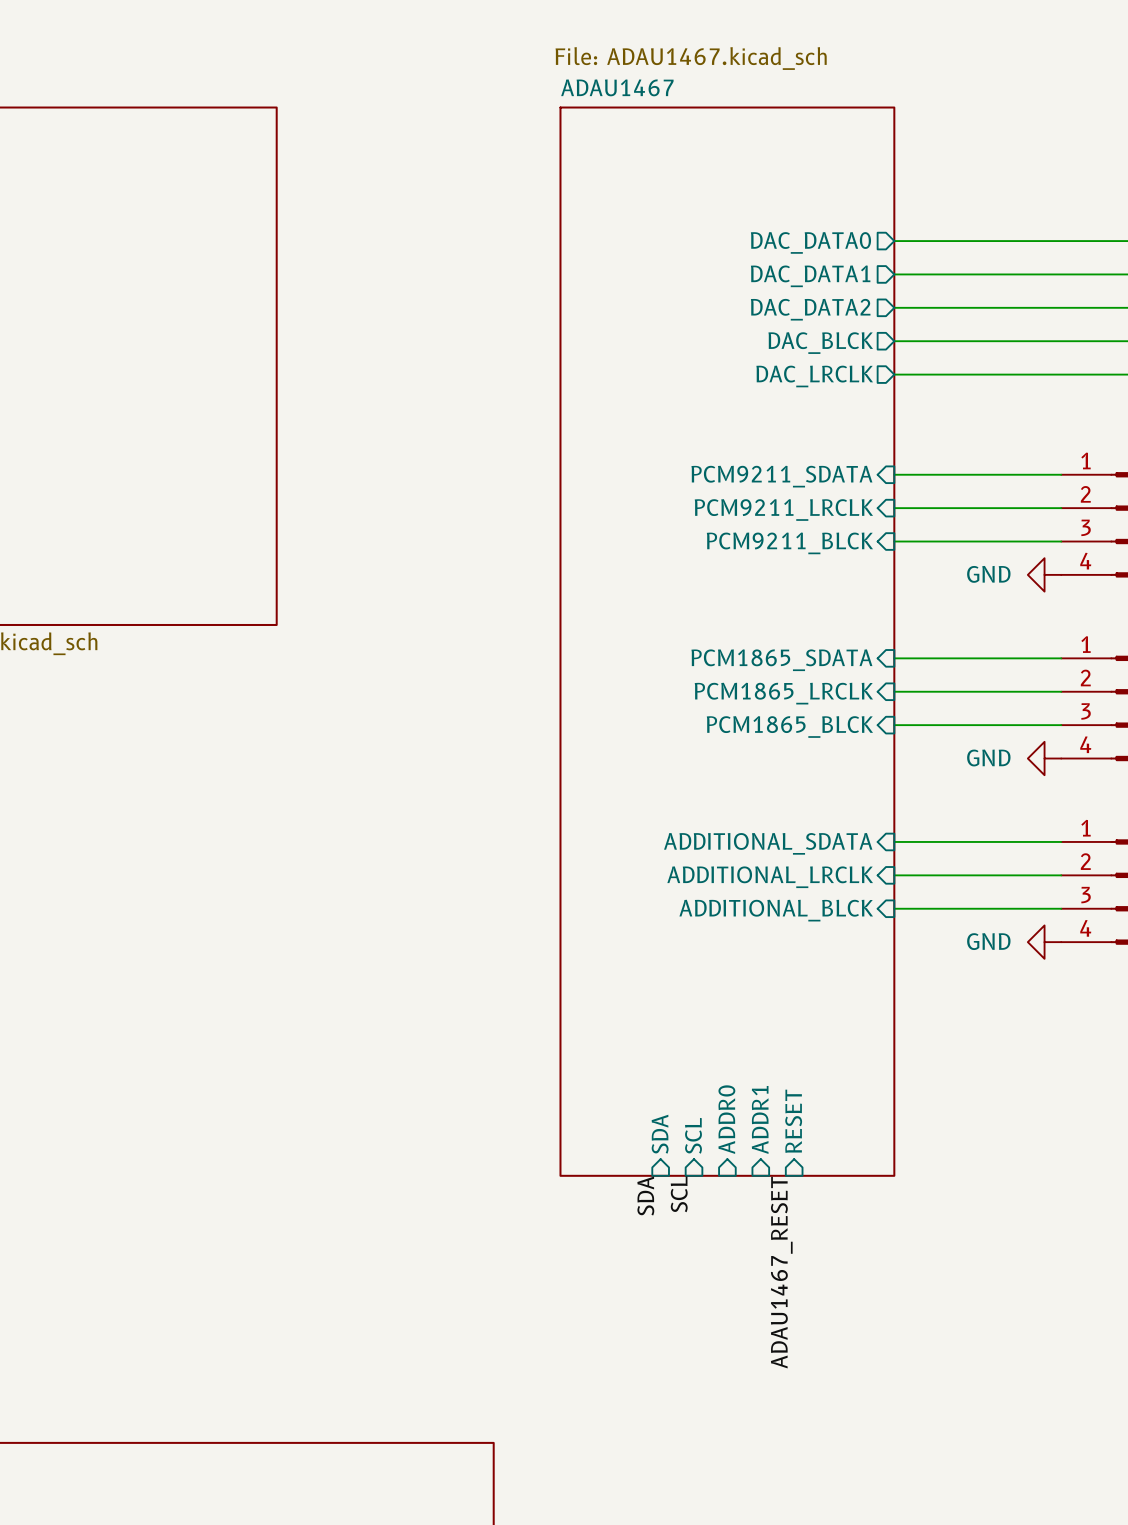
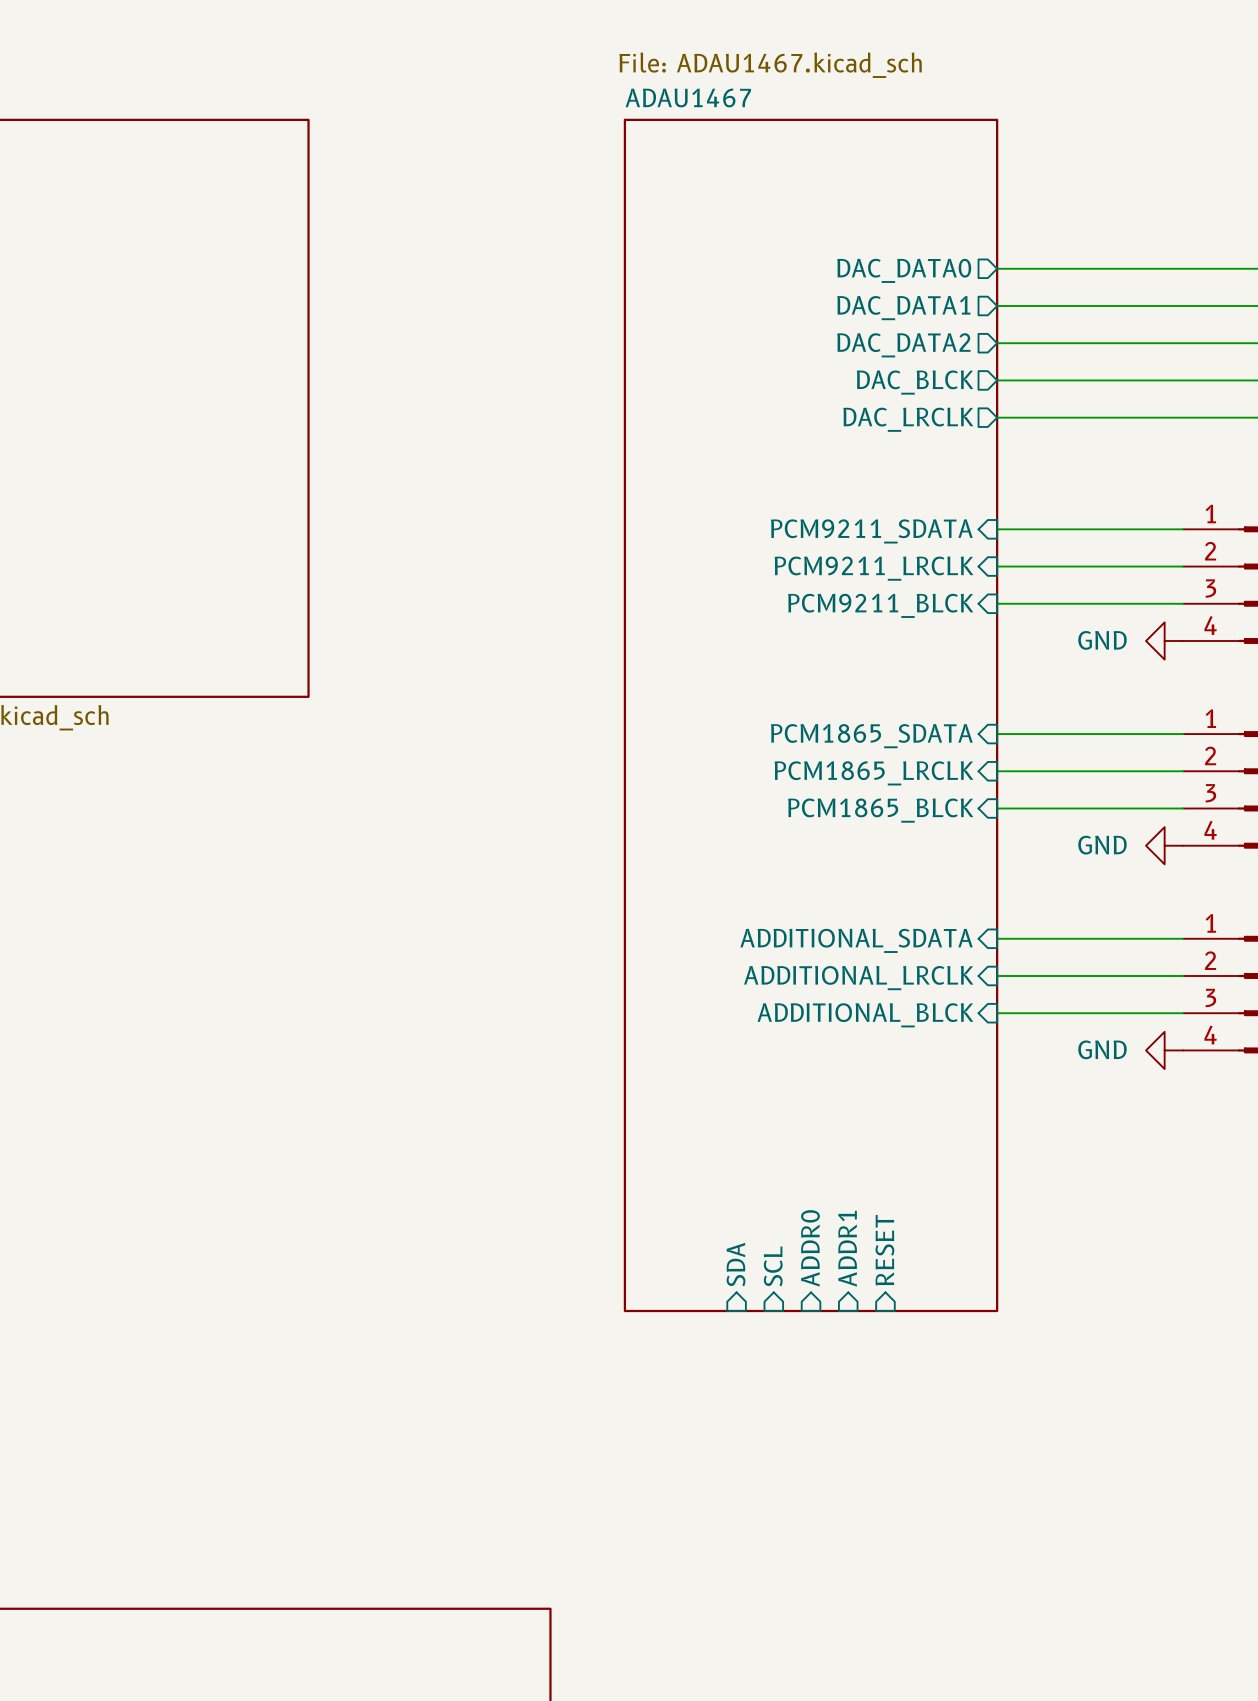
label: SCL (679, 1194) -> none
label: SDA (645, 1196) -> none
label: ADAU1467_RESET (781, 1272) -> none

